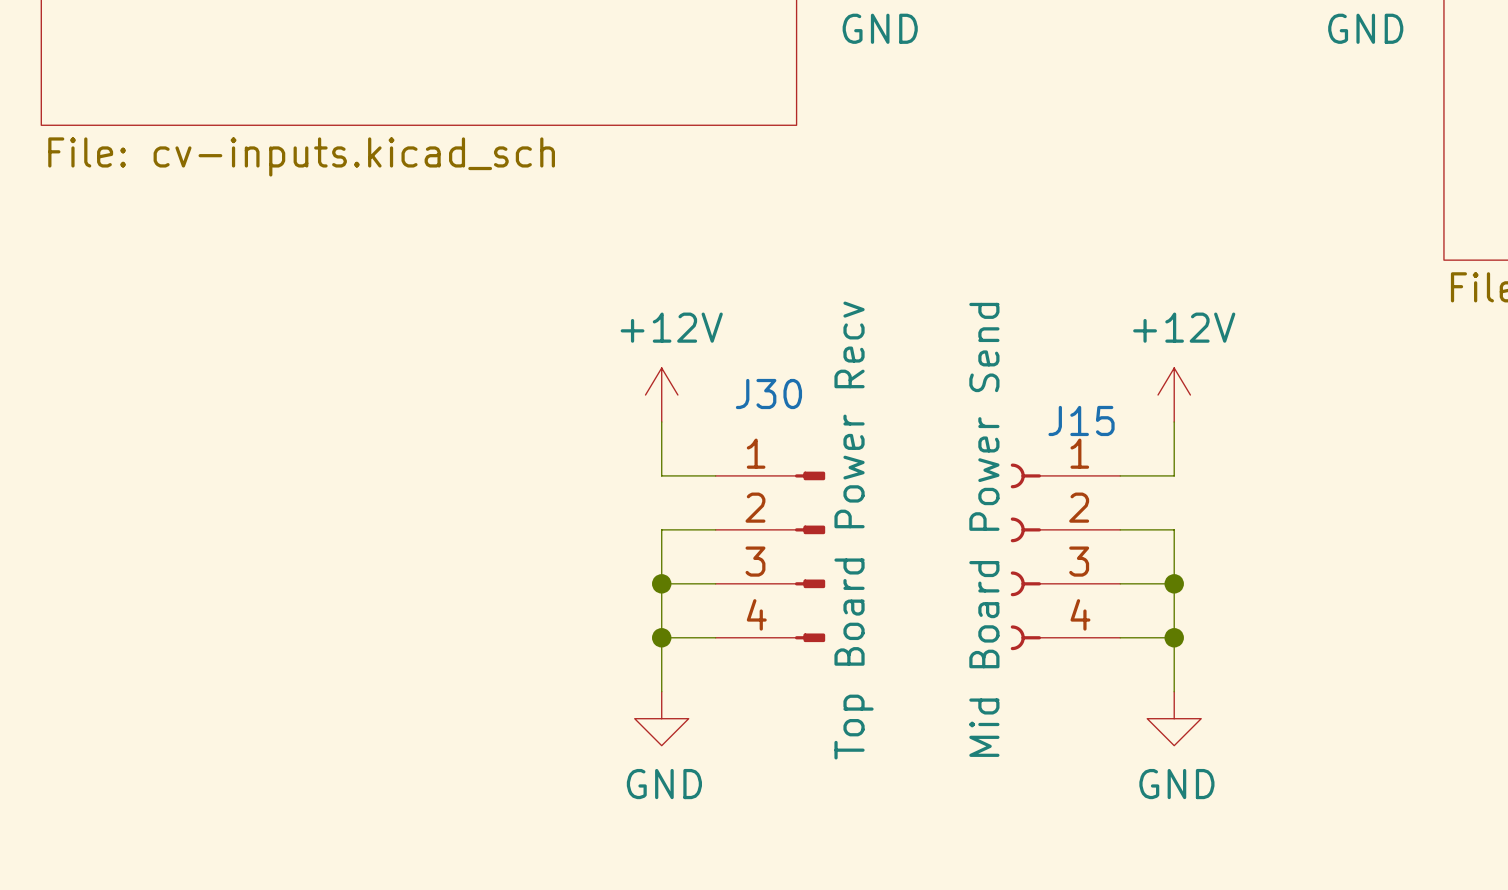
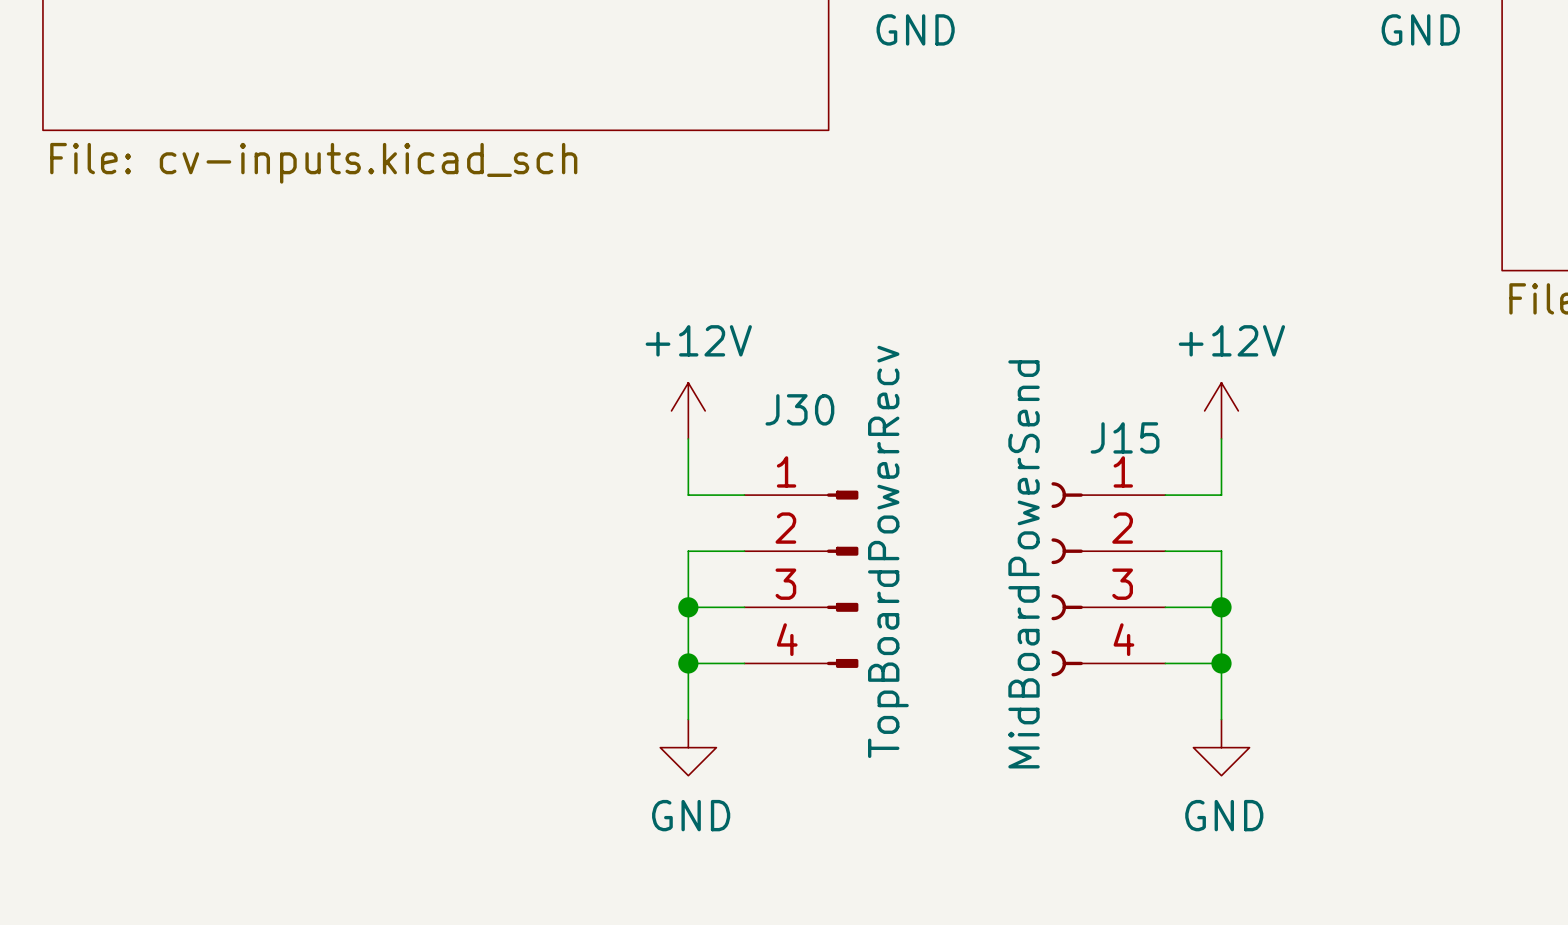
J15 text: Mid Board Power Send (984, 529) -> none
J30 text: Top Board Power Recv (854, 530) -> none
J30 value: none -> TopBoardPowerRecv (888, 551)
J15 value: none -> MidBoardPowerSend (1024, 564)

